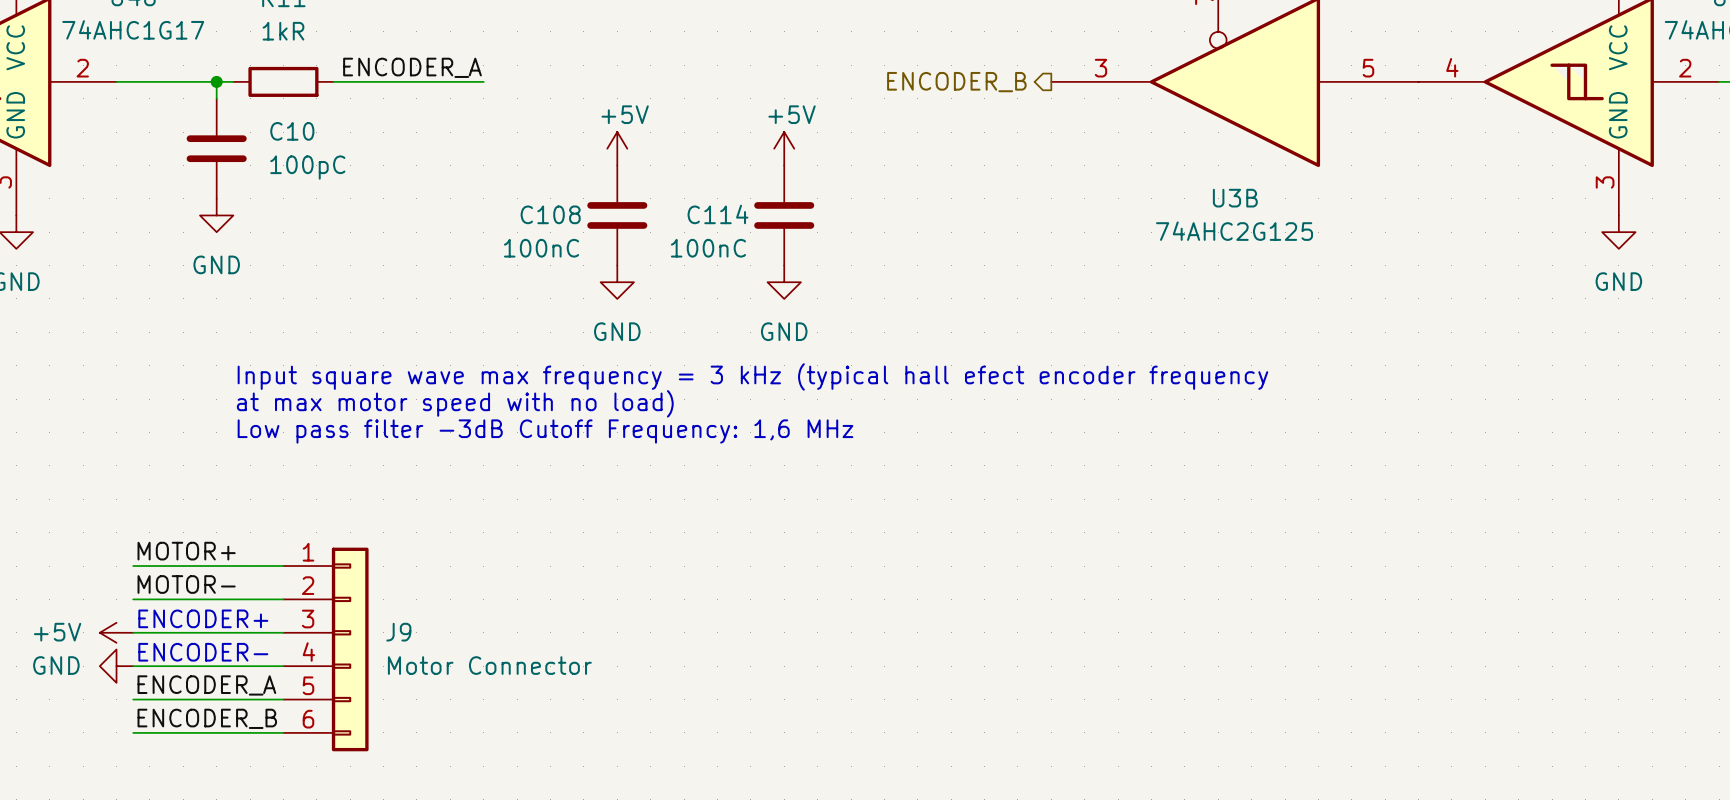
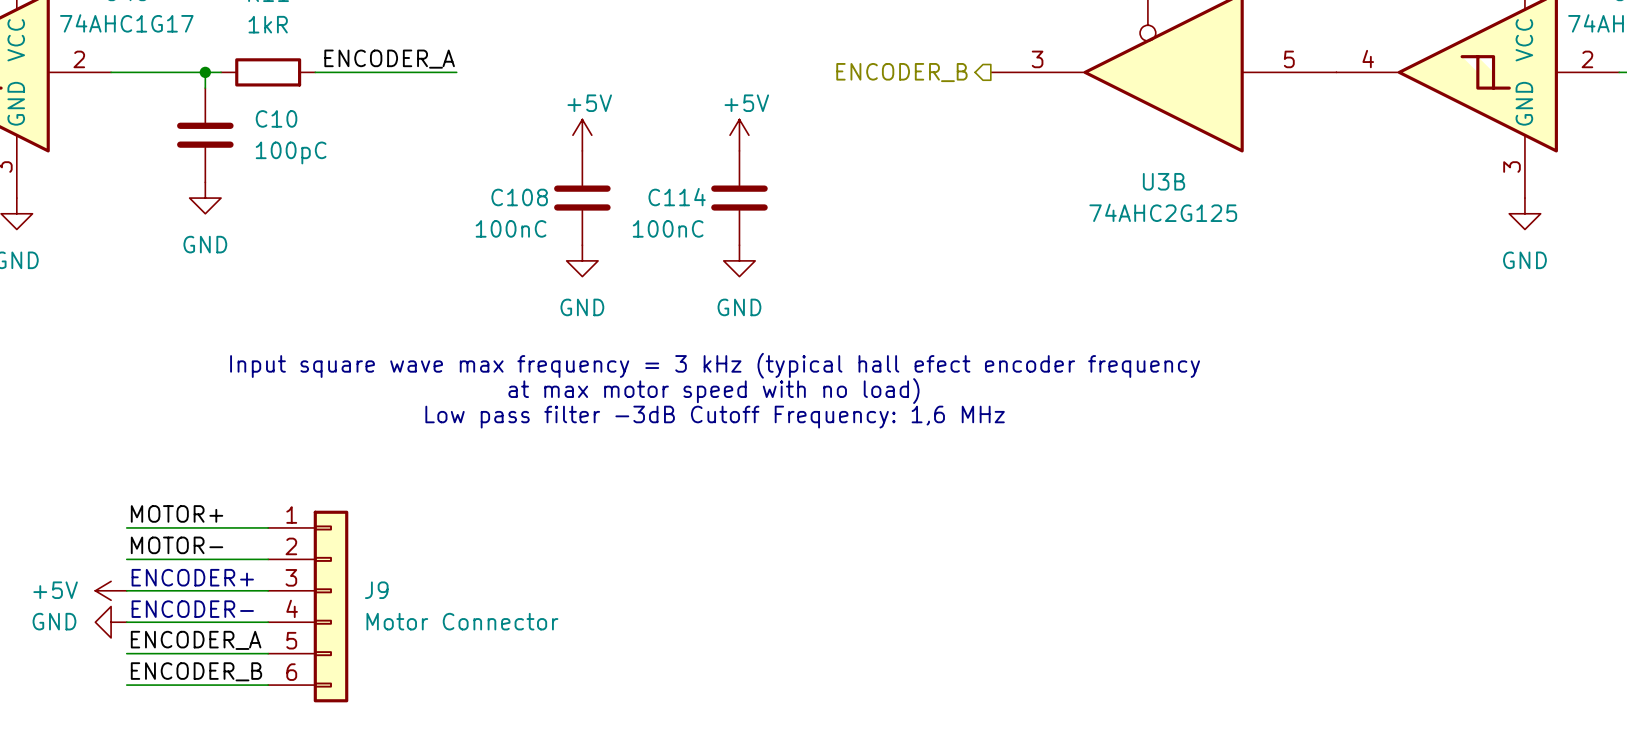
text: Input square wave max frequency = 3 kHz (typical hall efect encoder frequency (752, 376) -> none
text: none -> Input square wave max frequency = 3 kHz (typical hall efect encoder frequency (715, 365)
text: at max motor speed with no load) (455, 403) -> none
text: none -> at max motor speed with no load) (713, 391)
text: Low pass filter -3dB Cutoff Frequency: 1,6 MHz (545, 431) -> none
text: none -> Low pass filter -3dB Cutoff Frequency: 1,6 MHz (715, 417)

